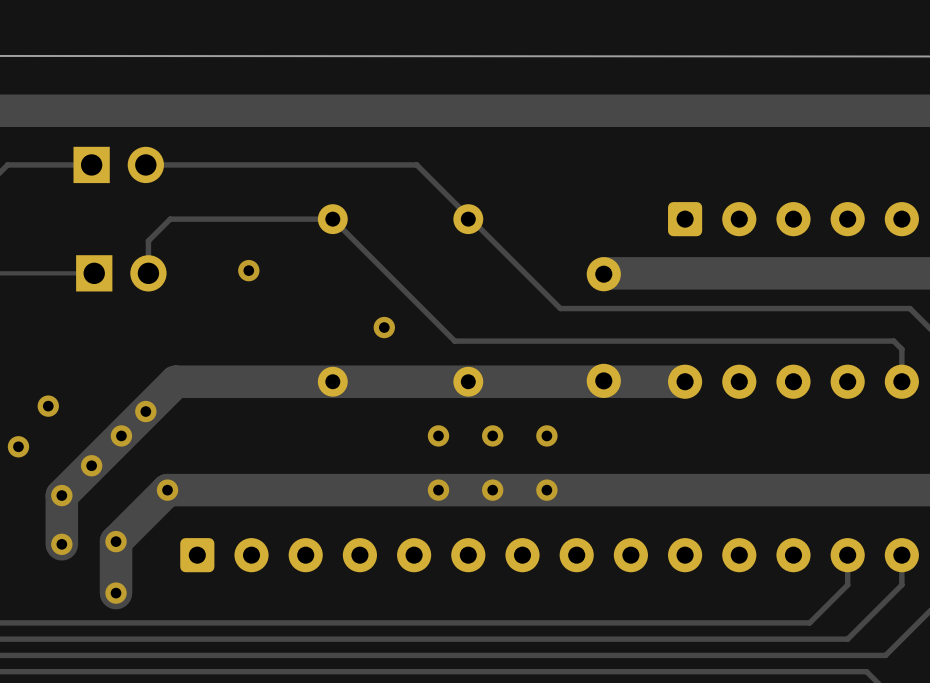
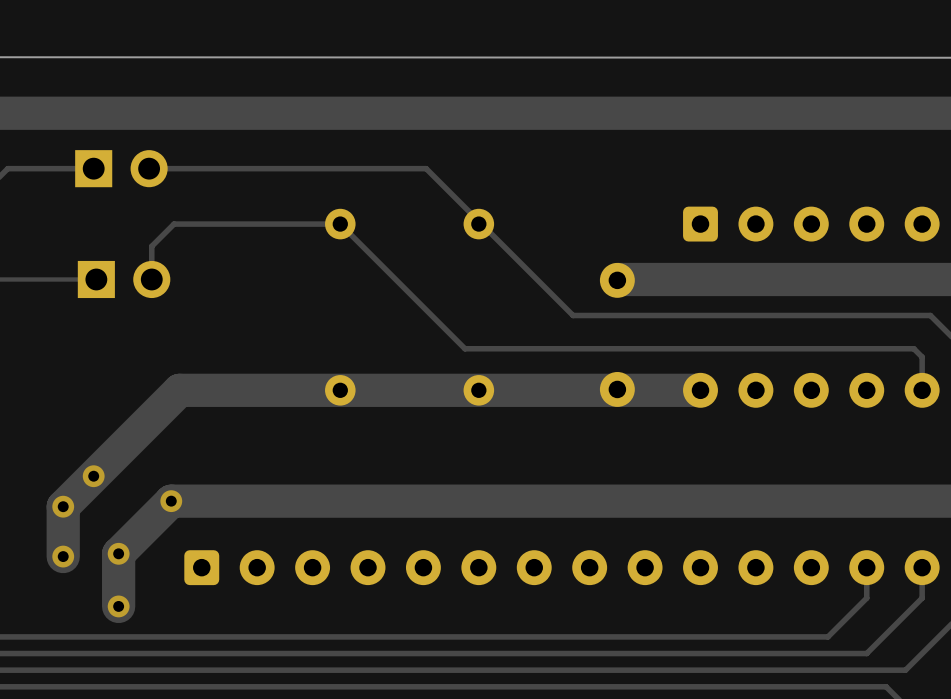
via: (248, 270) -> none
via: (384, 327) -> none
via: (48, 406) -> none
via: (145, 411) -> none
via: (121, 435) -> none
via: (438, 435) -> none
via: (492, 435) -> none
via: (546, 435) -> none
via: (18, 446) -> none
via: (438, 490) -> none
via: (492, 490) -> none
via: (546, 490) -> none

